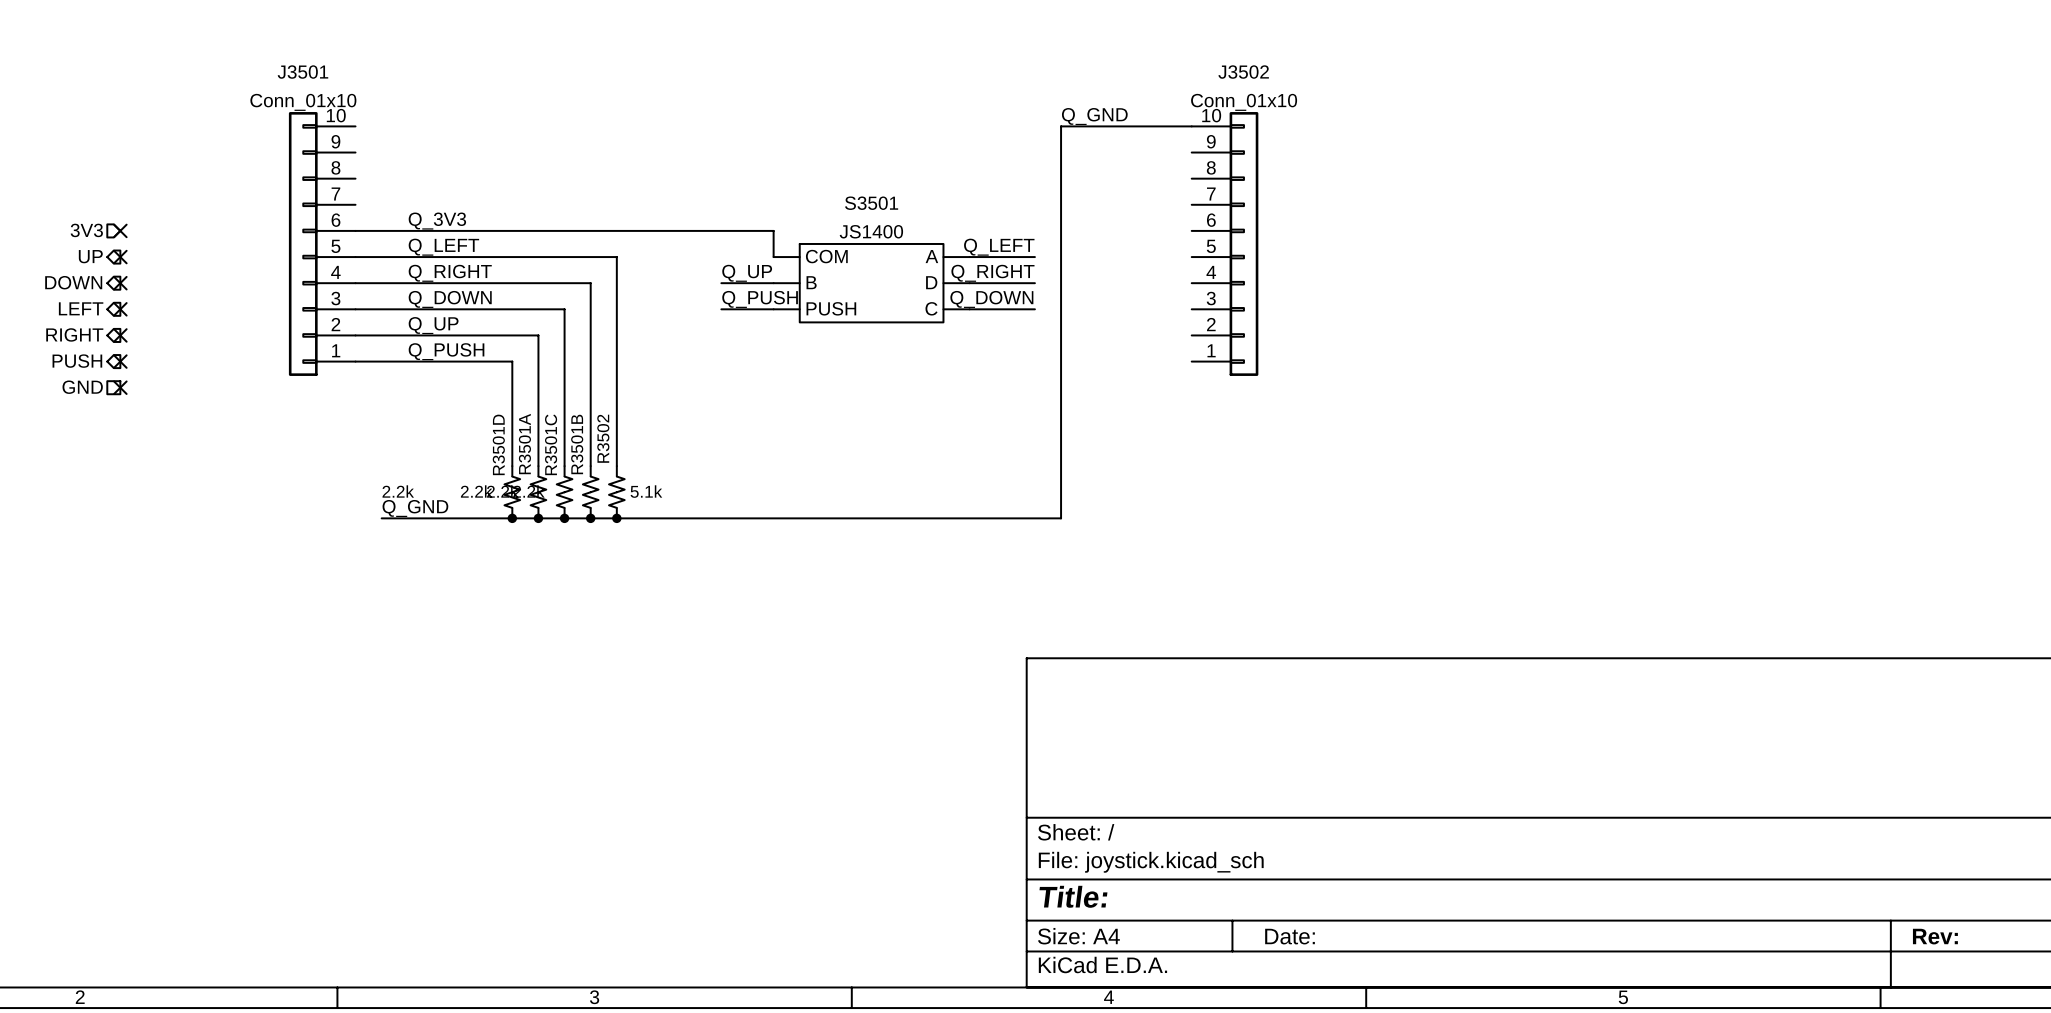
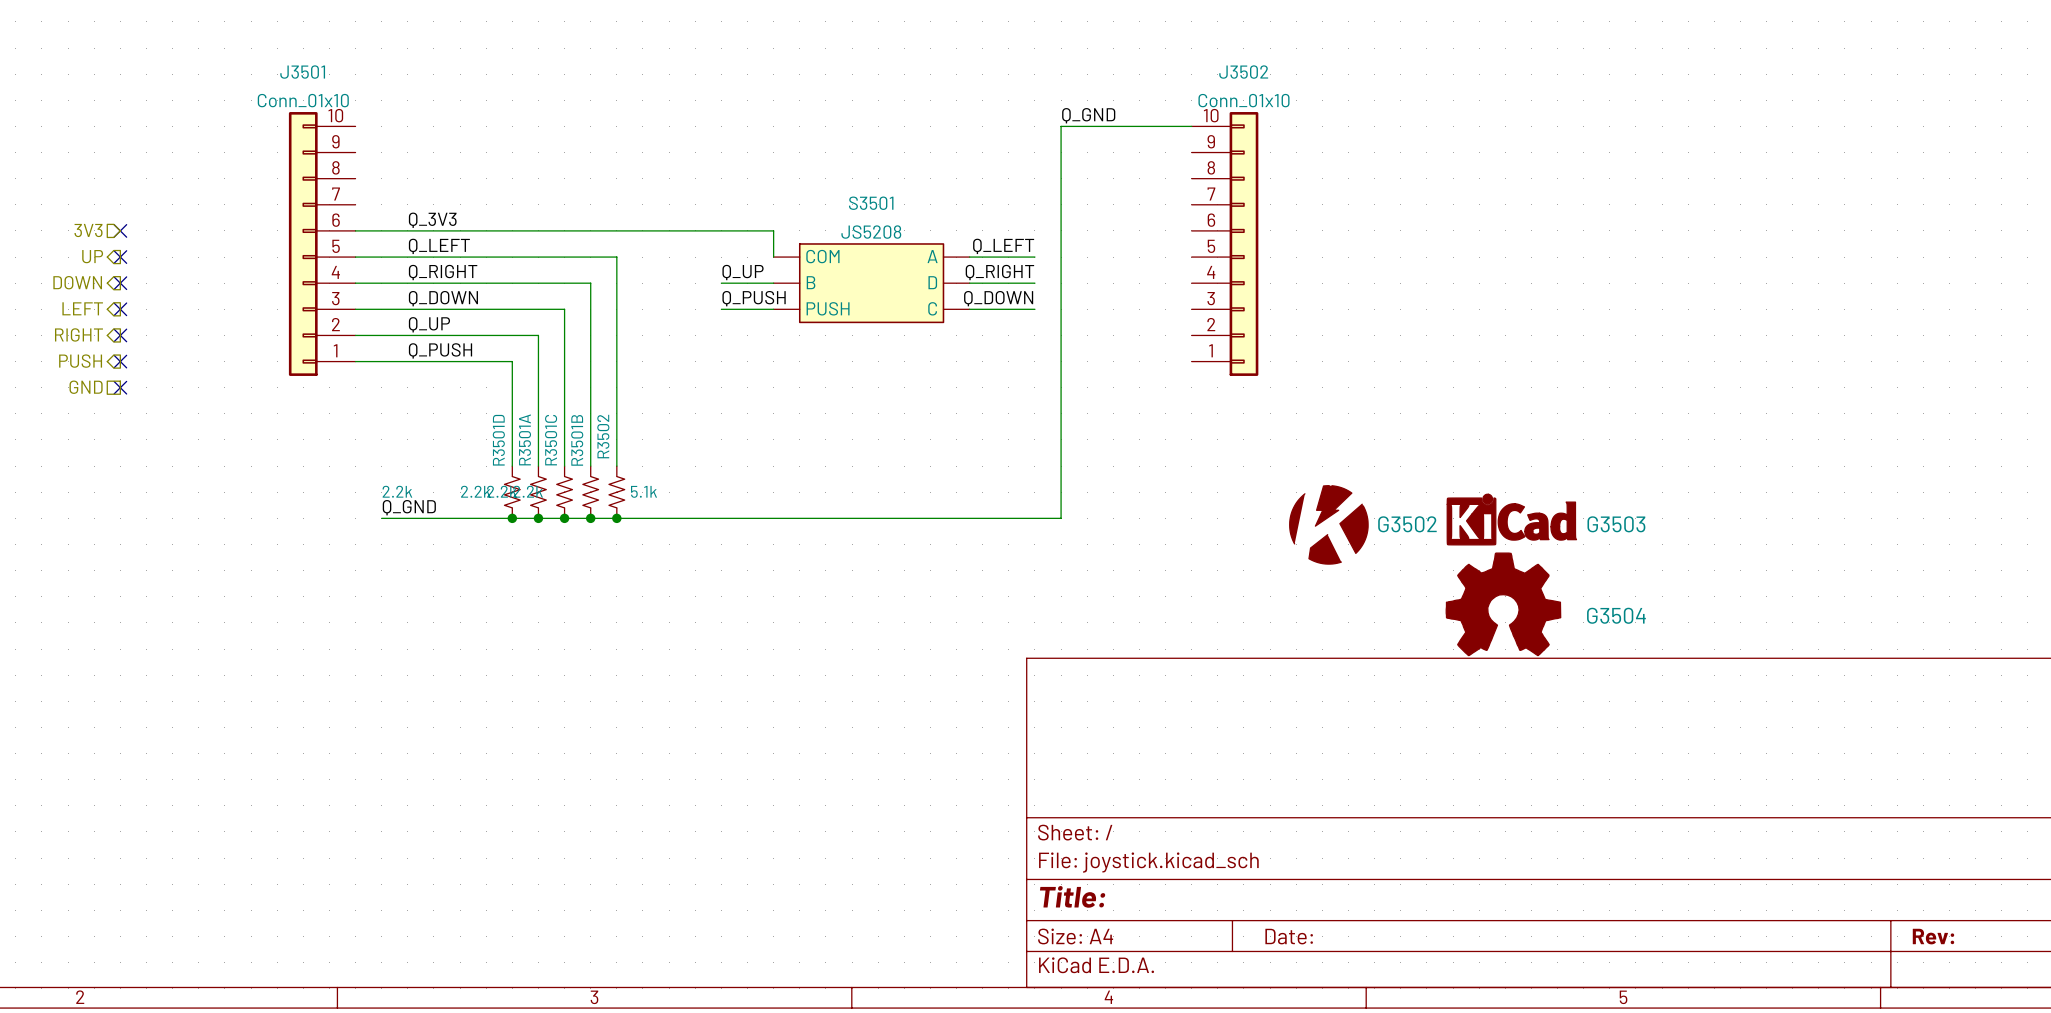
S3501 value: JS1400 (871, 231) -> JS5208 (871, 232)
G3503: none -> (1511, 519)
G3502: none -> (1328, 524)
G3504: none -> (1503, 604)

